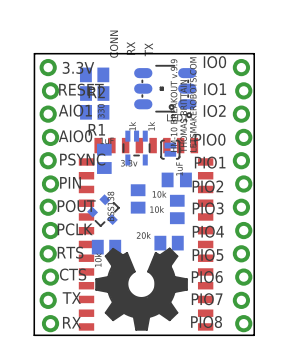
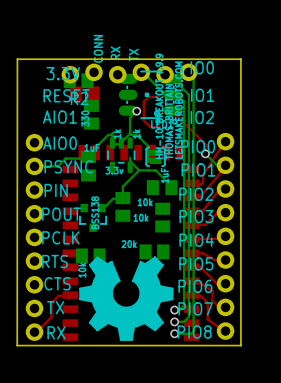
bottom track: none -> (141, 72) (162, 92) (174, 92) (184, 101) (184, 305) (179, 310) (174, 310)
bottom track: none -> (188, 72) (193, 77) (193, 331) (191, 333) (174, 333)
part: none -> (129, 73)
bottom track: none -> (165, 74) (168, 74) (188, 94) (188, 317) (184, 321) (174, 321)
top track: none -> (159, 95) (148, 96) (143, 101) (143, 120) (150, 126) (159, 126)
part side: bottom (94, 93) -> top (84, 93)
bottom track: none -> (136, 111) (130, 117) (130, 133)
via: none -> (136, 111)
top track: none -> (159, 111) (172, 111) (205, 144) (205, 153)
part: none -> (91, 114)
R1: (94, 112) -> none
bottom track: none -> (130, 133) (119, 144) (115, 144) (112, 141) (112, 133) (108, 134) (88, 154) (88, 159) (65, 158) (57, 166) (34, 166)
bottom track: none -> (130, 133) (136, 134) (148, 146) (148, 162)
top track: none -> (225, 141) (203, 175) (203, 182) (200, 184) (191, 183)
bottom track: none -> (205, 153) (216, 165) (225, 165)
via: none -> (205, 153)
bottom track: none -> (130, 157) (130, 161) (139, 170)
top track: none -> (225, 165) (200, 196) (191, 197)
bottom track: none -> (139, 170) (122, 186) (122, 198) (113, 198) (101, 208)
bottom track: none -> (148, 170) (139, 170)
bottom track: none -> (148, 170) (155, 170) (165, 179)
top track: none -> (225, 189) (219, 189) (203, 210) (191, 211)
part: (49, 195) -> none
part: (242, 195) -> none
top track: none -> (225, 212) (217, 212) (205, 224) (191, 225)
part rotation: 0° (103, 210) -> 45° clockwise (93, 217)
top track: none -> (225, 236) (221, 238) (191, 239)
part: none -> (225, 236)
part: none -> (34, 237)
top track: none -> (191, 253) (203, 253) (214, 260) (225, 260)
top track: none -> (191, 267) (200, 267) (216, 283) (225, 283)
top track: none -> (191, 281) (198, 281) (212, 291) (212, 300) (219, 307) (225, 307)
top track: none -> (70, 295) (58, 295) (51, 302) (51, 317) (34, 332)
top track: none -> (191, 295) (200, 295) (207, 302) (207, 319) (225, 331)
via: none -> (174, 310)
via: none -> (174, 321)
via: none -> (174, 333)

